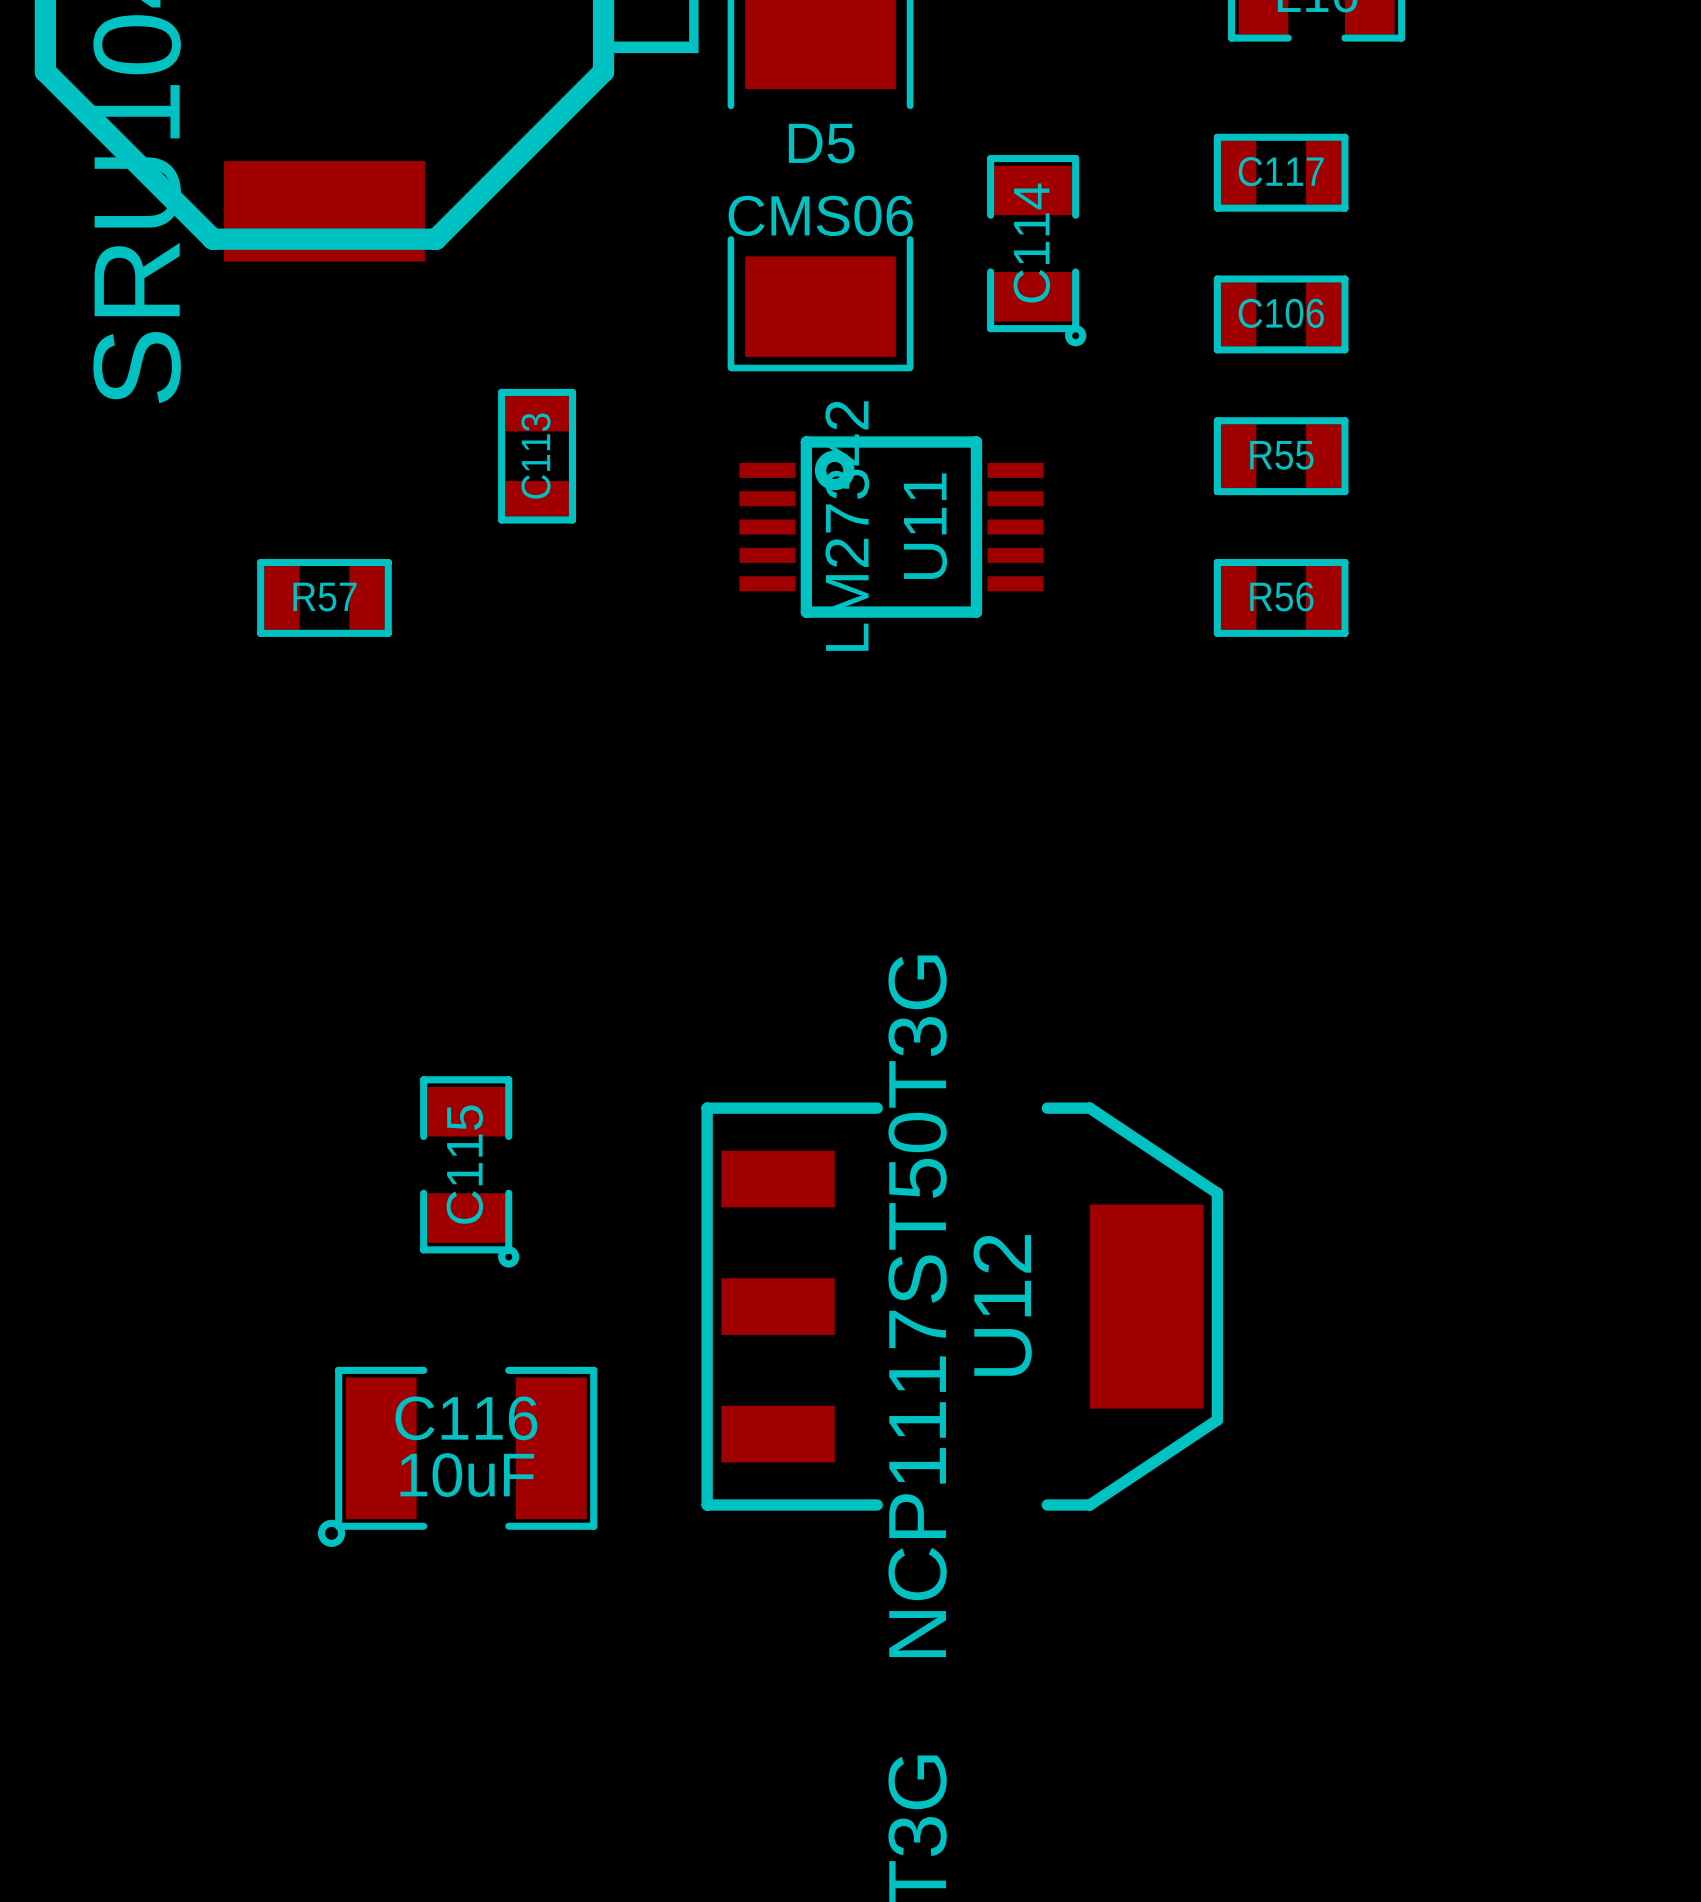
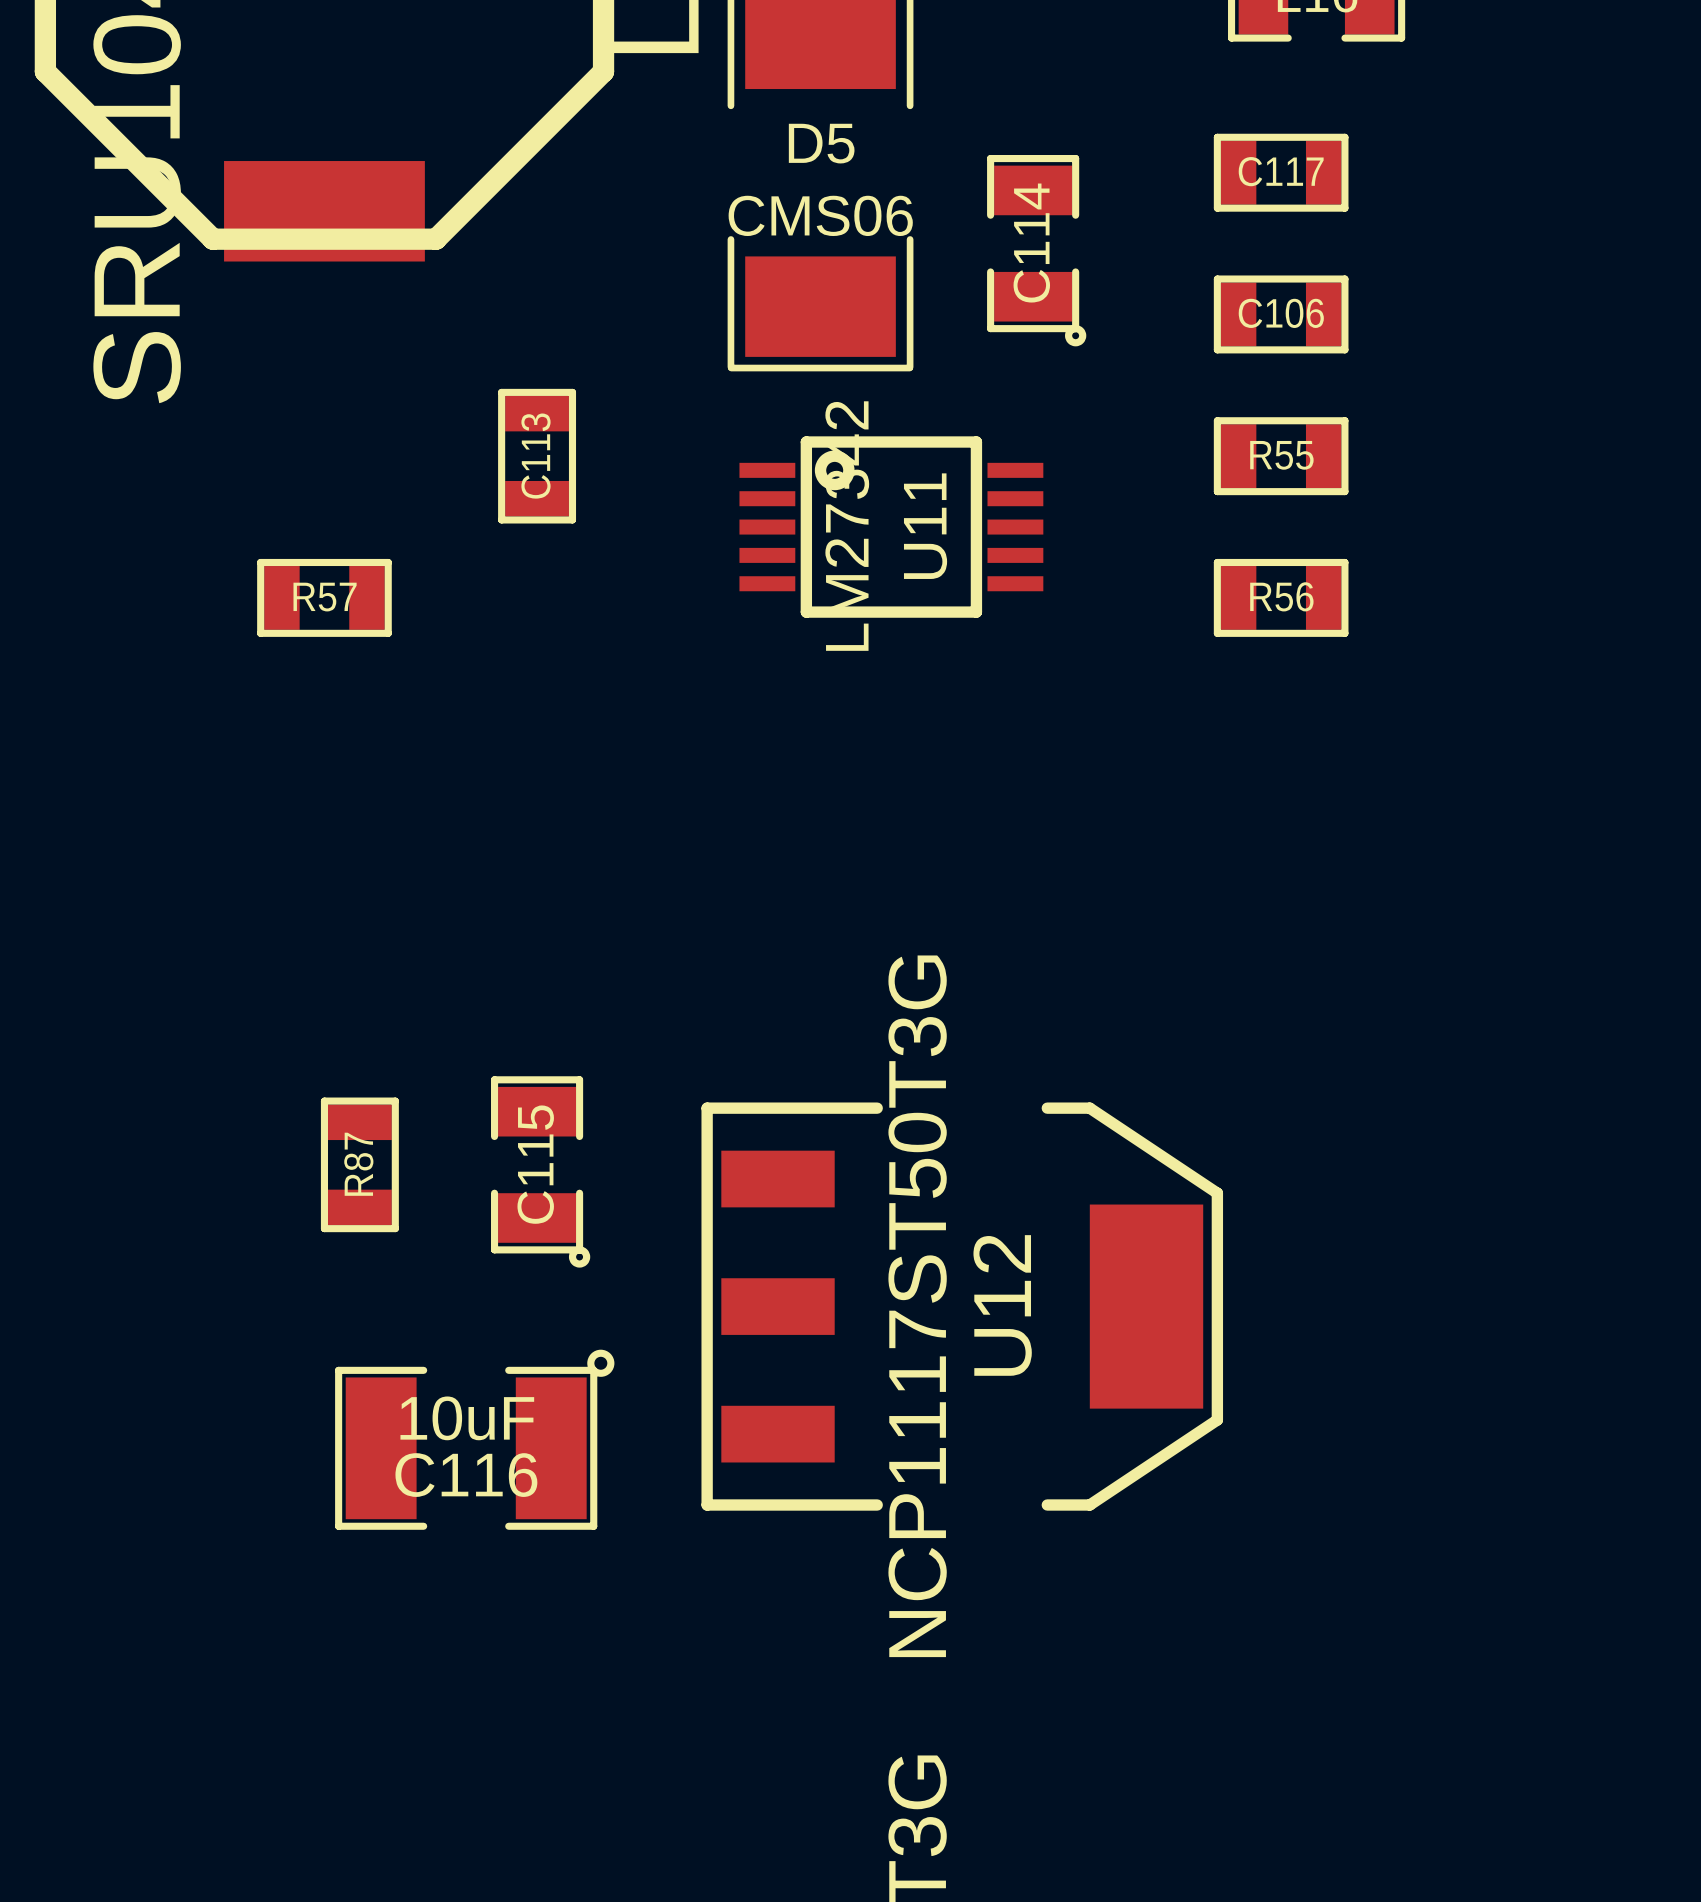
R87: none -> (359, 1164)
C115 position: (469, 1171) -> (540, 1171)
C116 rotation: 0° (457, 1456) -> 180° (474, 1439)

